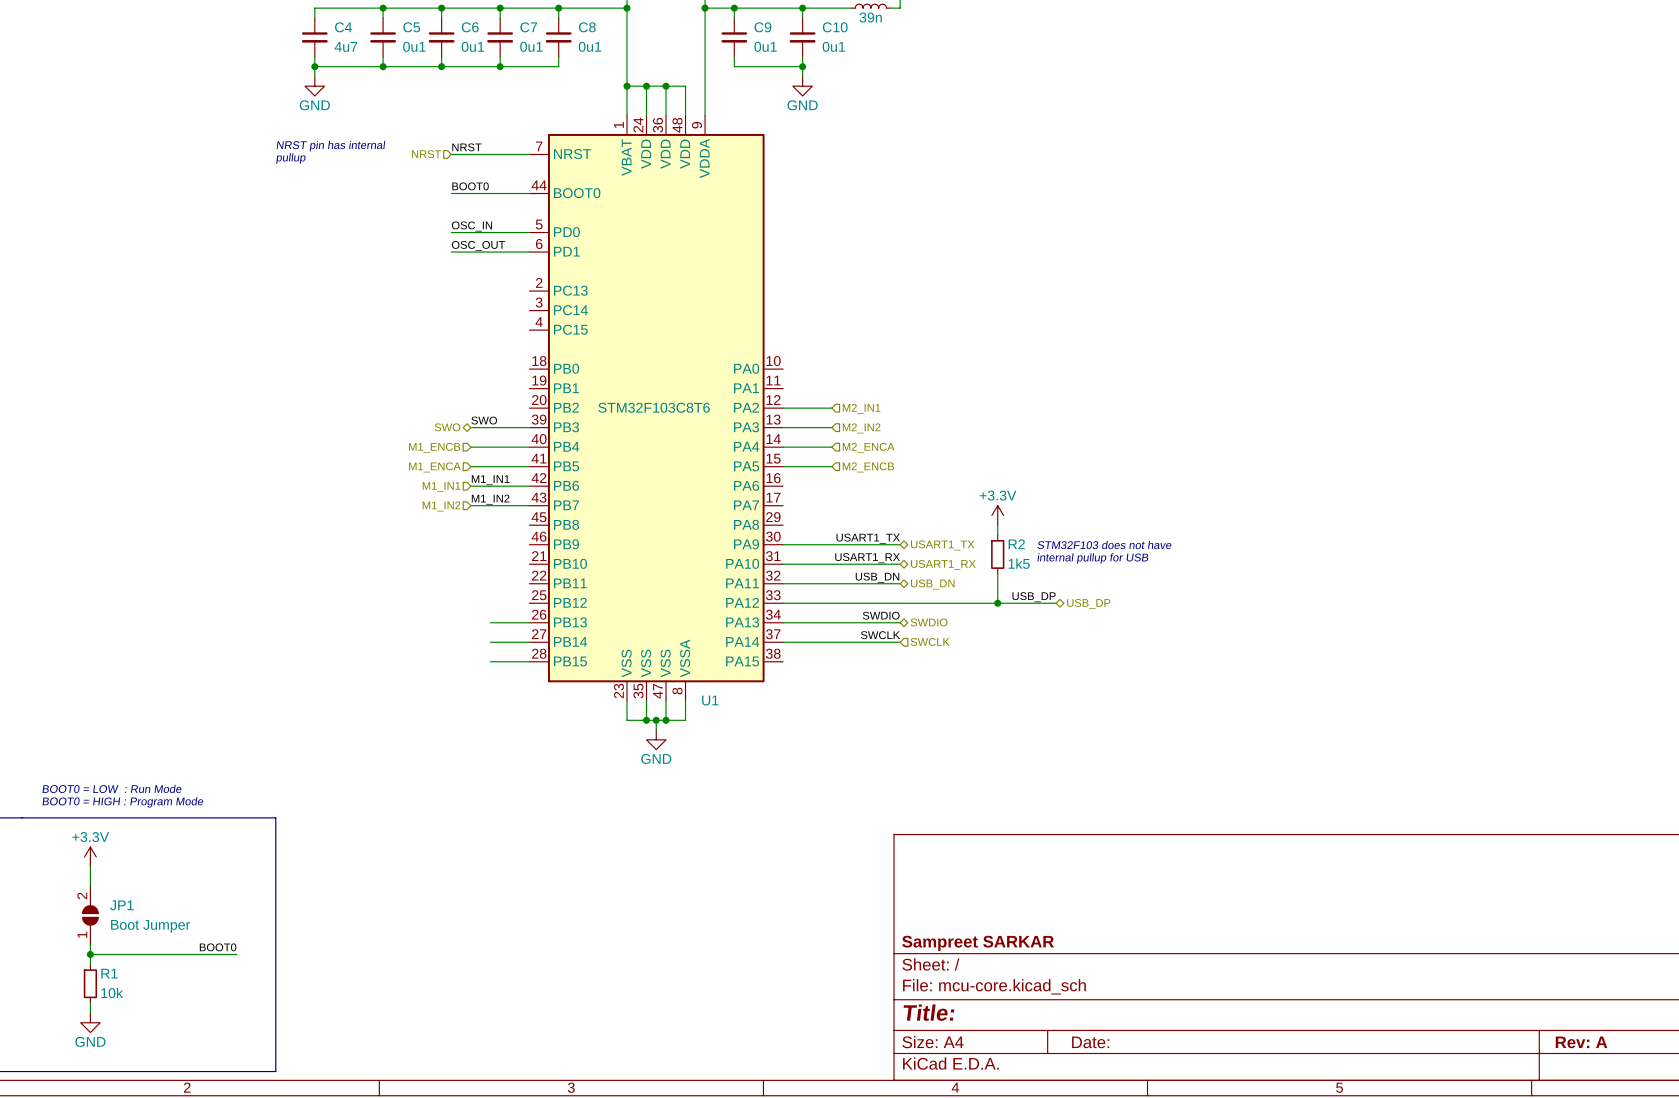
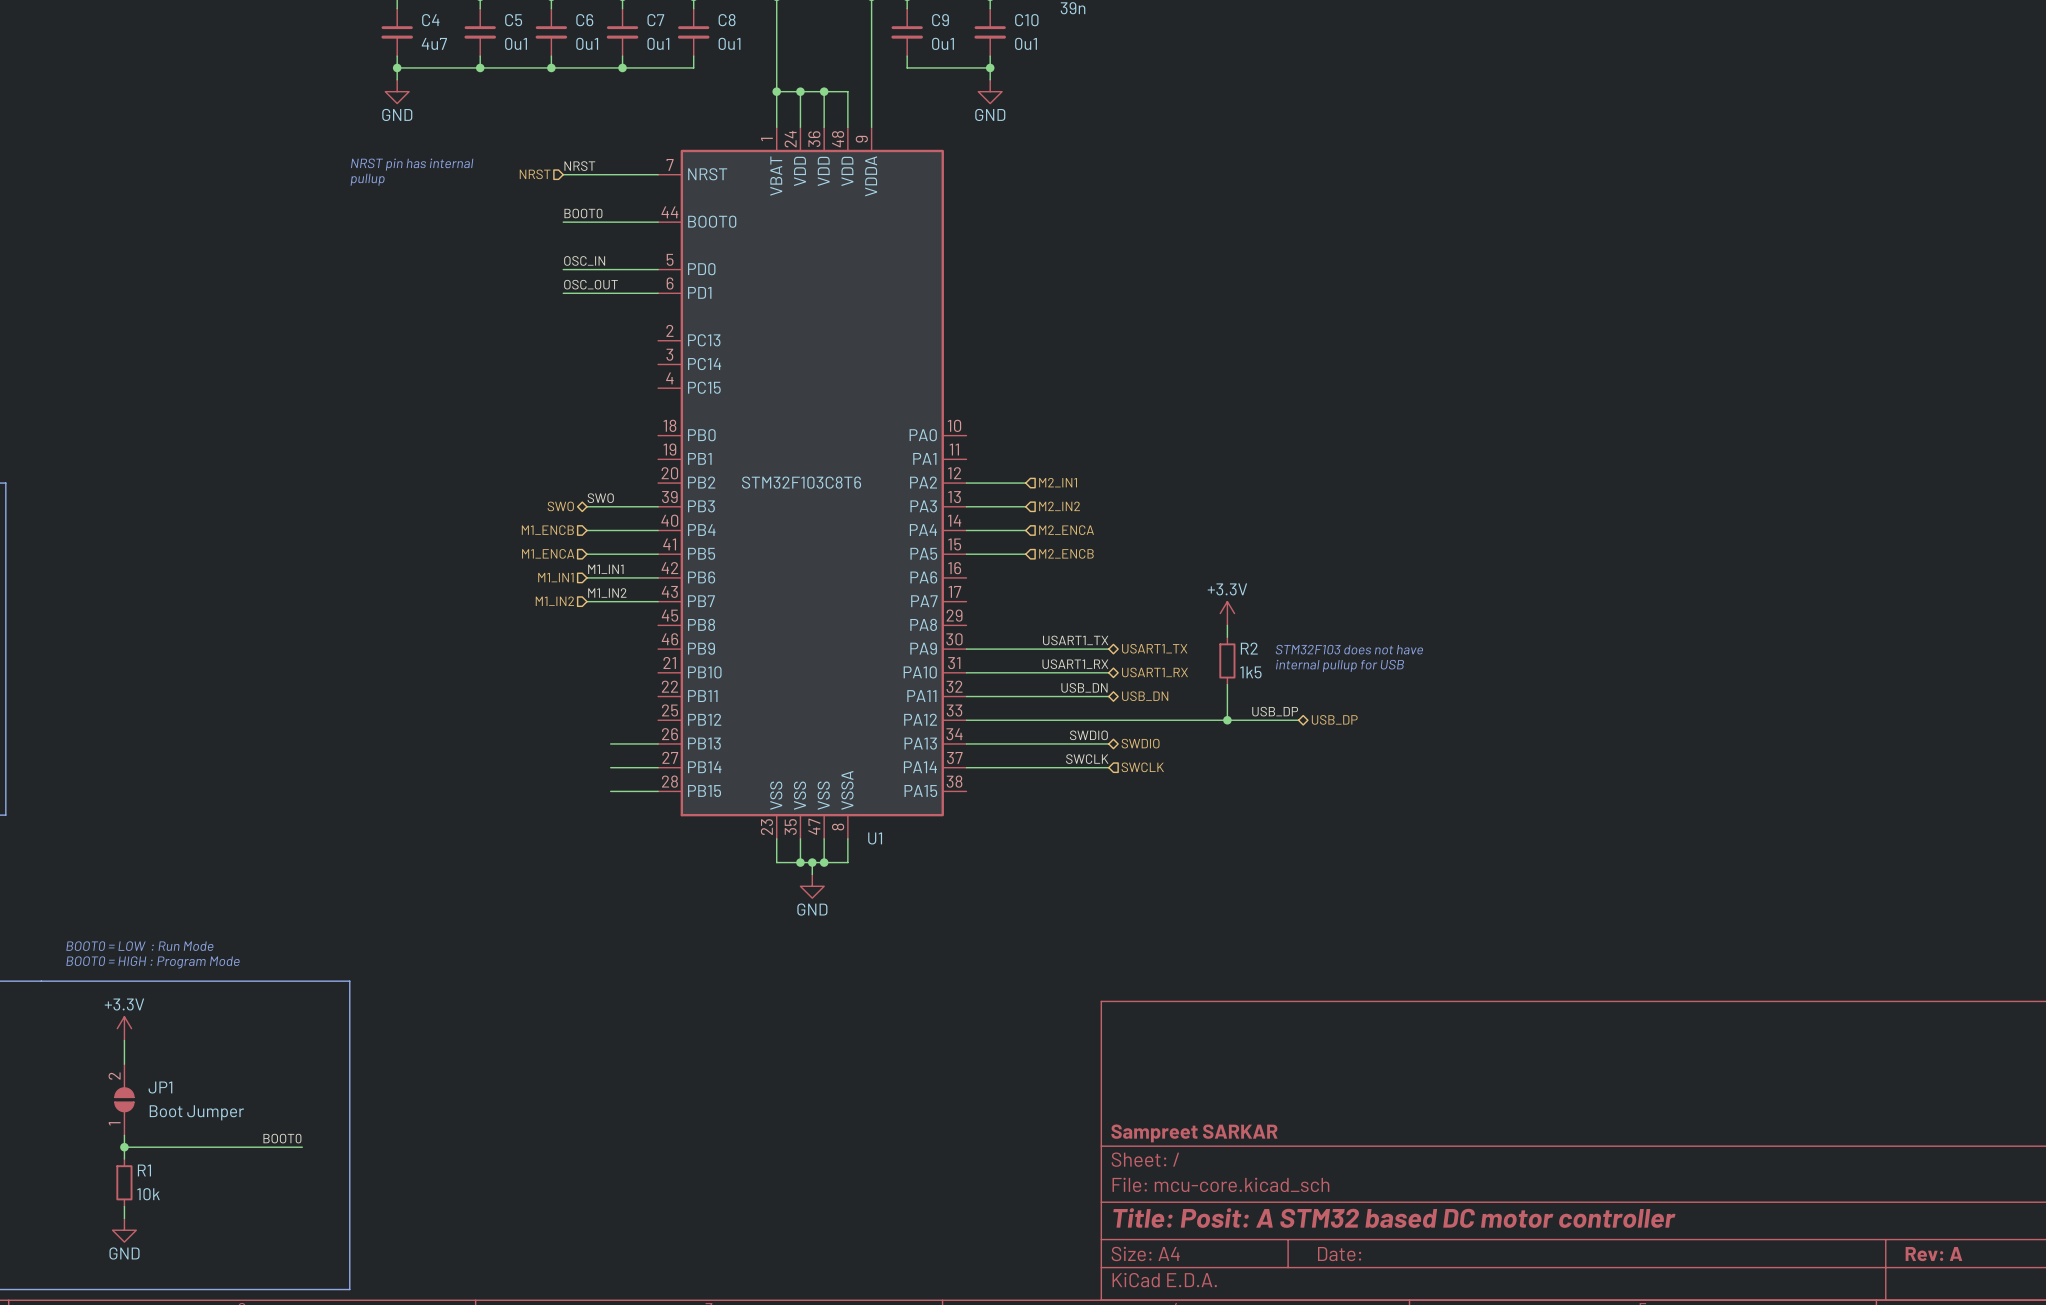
title block: Title: (928, 1012) -> Title: Posit: A STM32 based DC motor controller (1394, 1218)

